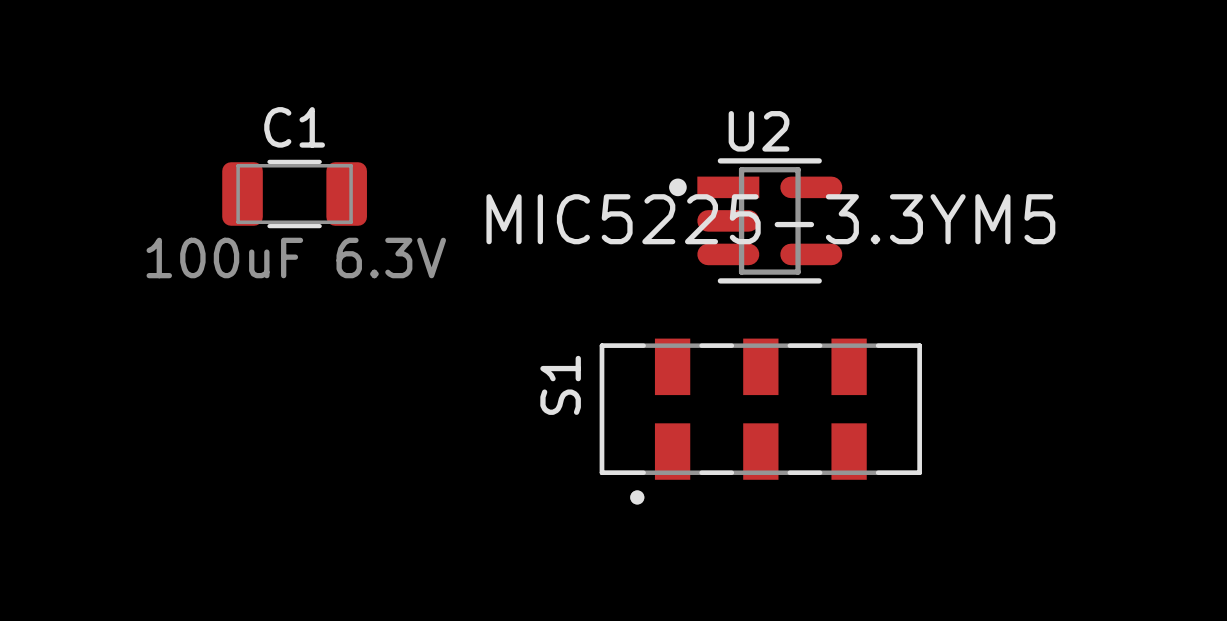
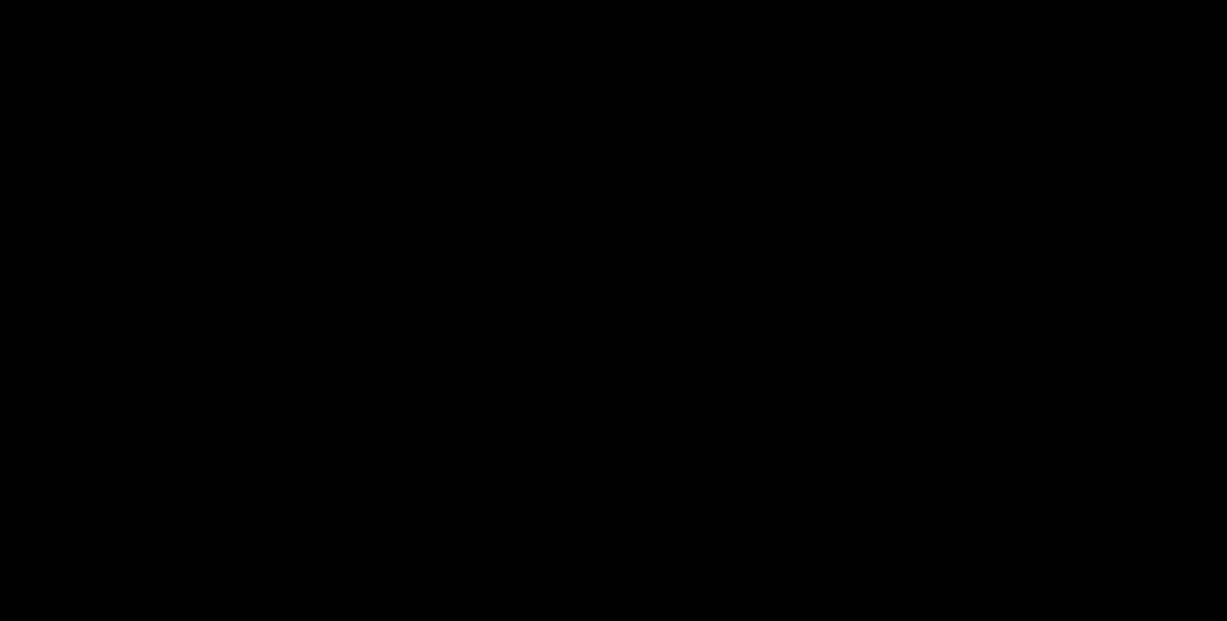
C1: 100uF 6.3V (294, 194) -> none
U2: MIC5225-3.3YM5 (755, 220) -> none
S1: (760, 421) -> none

